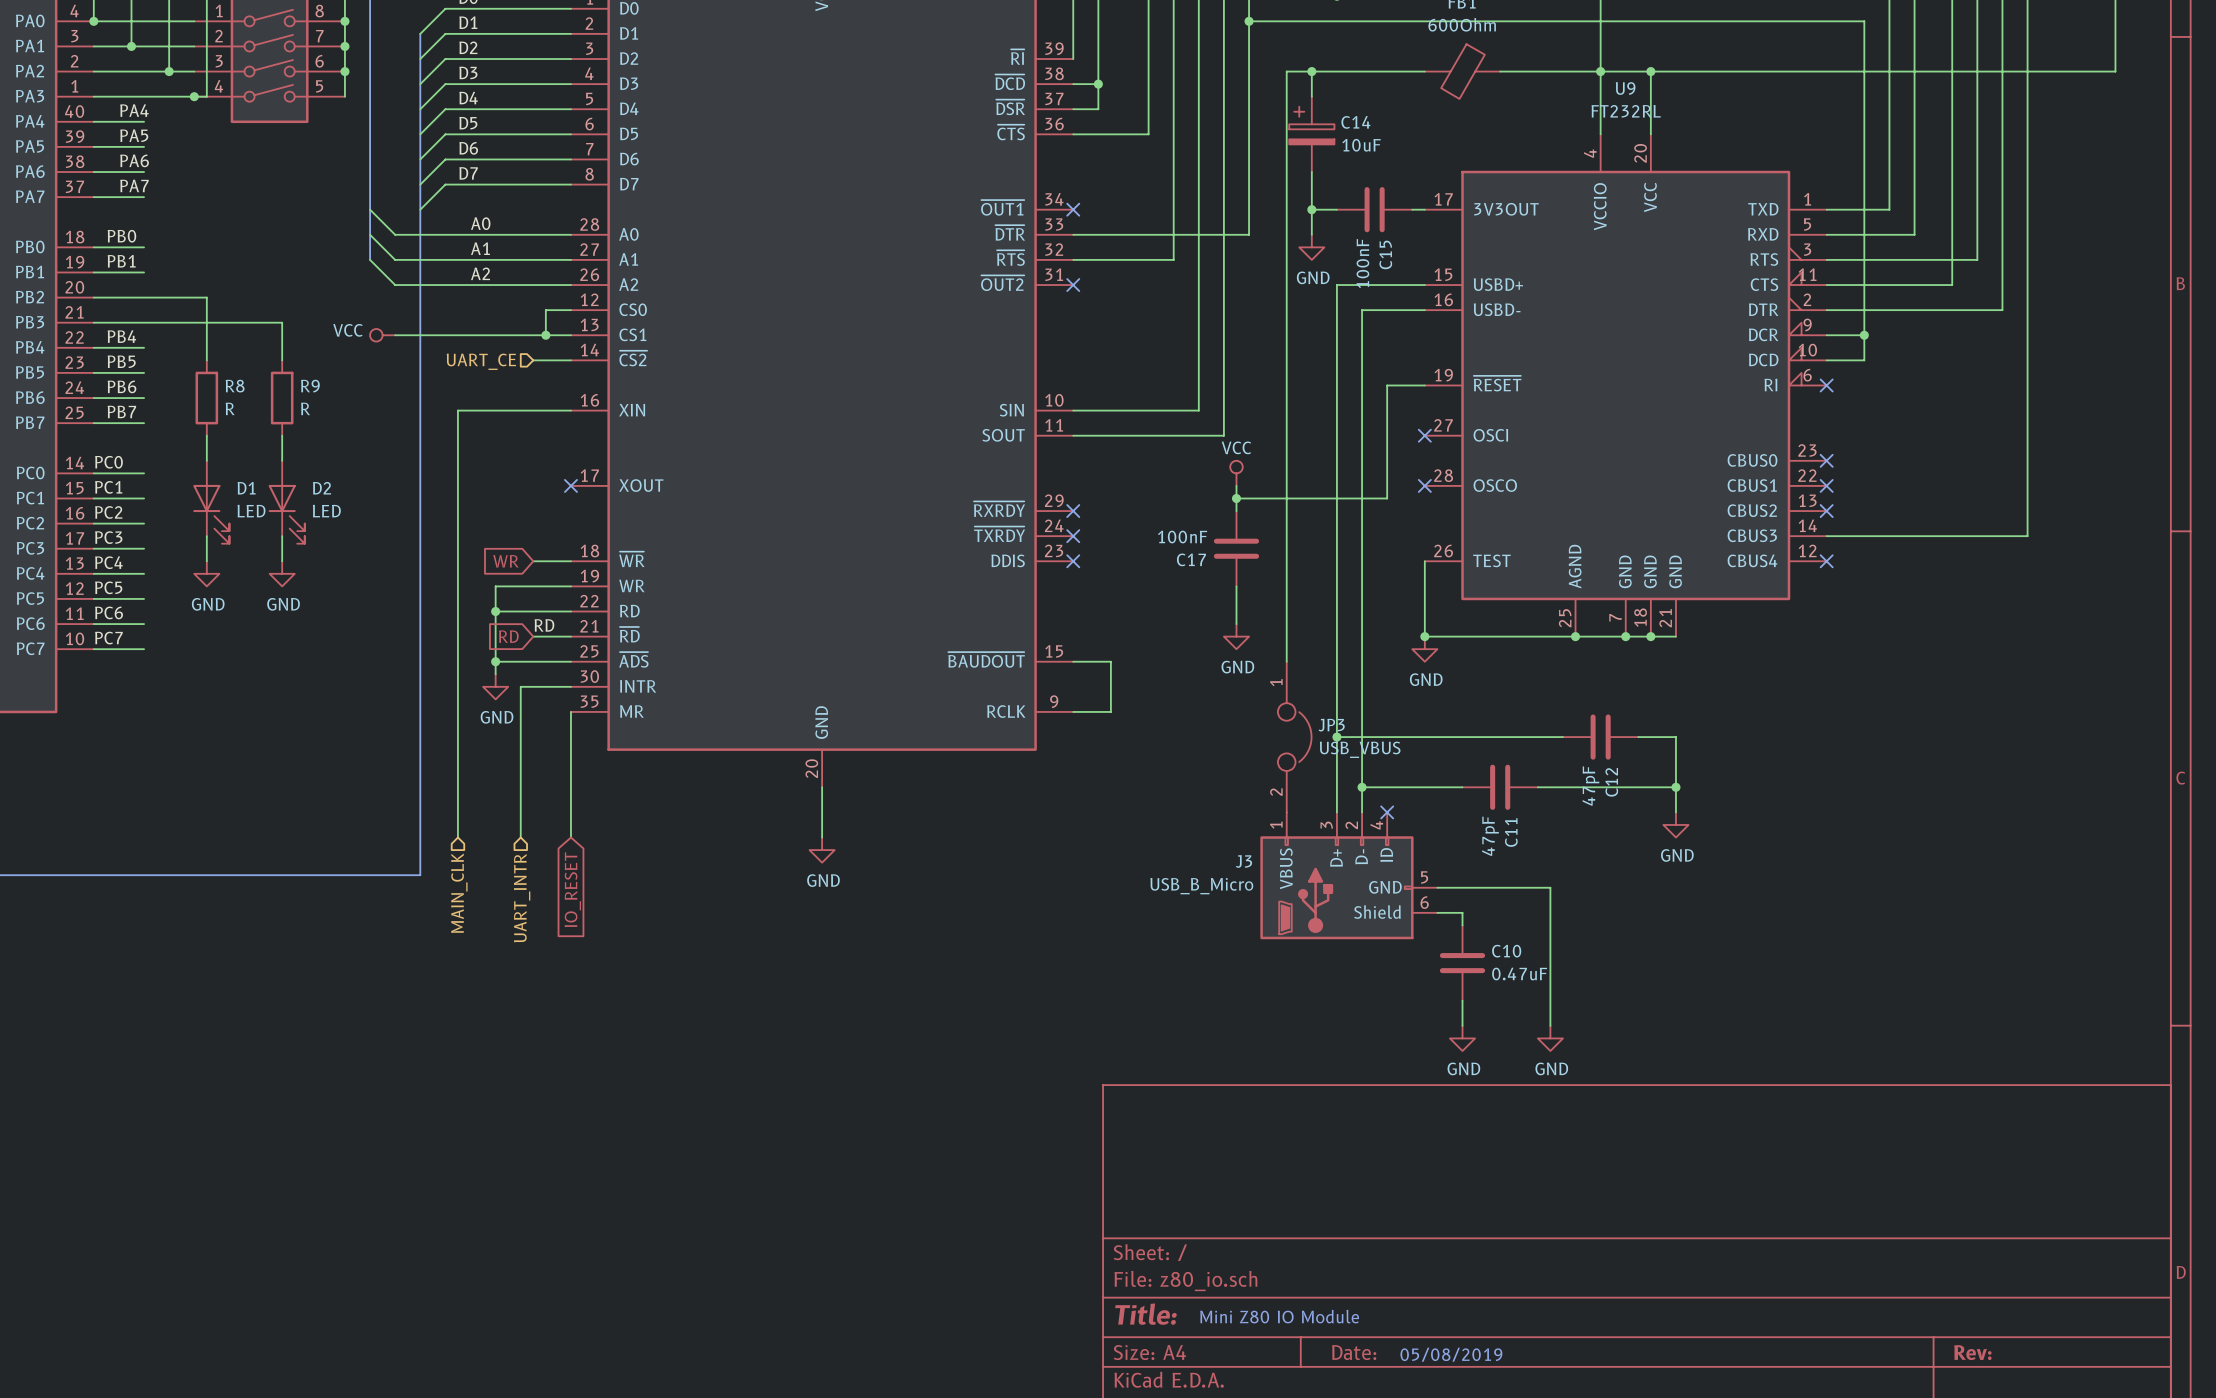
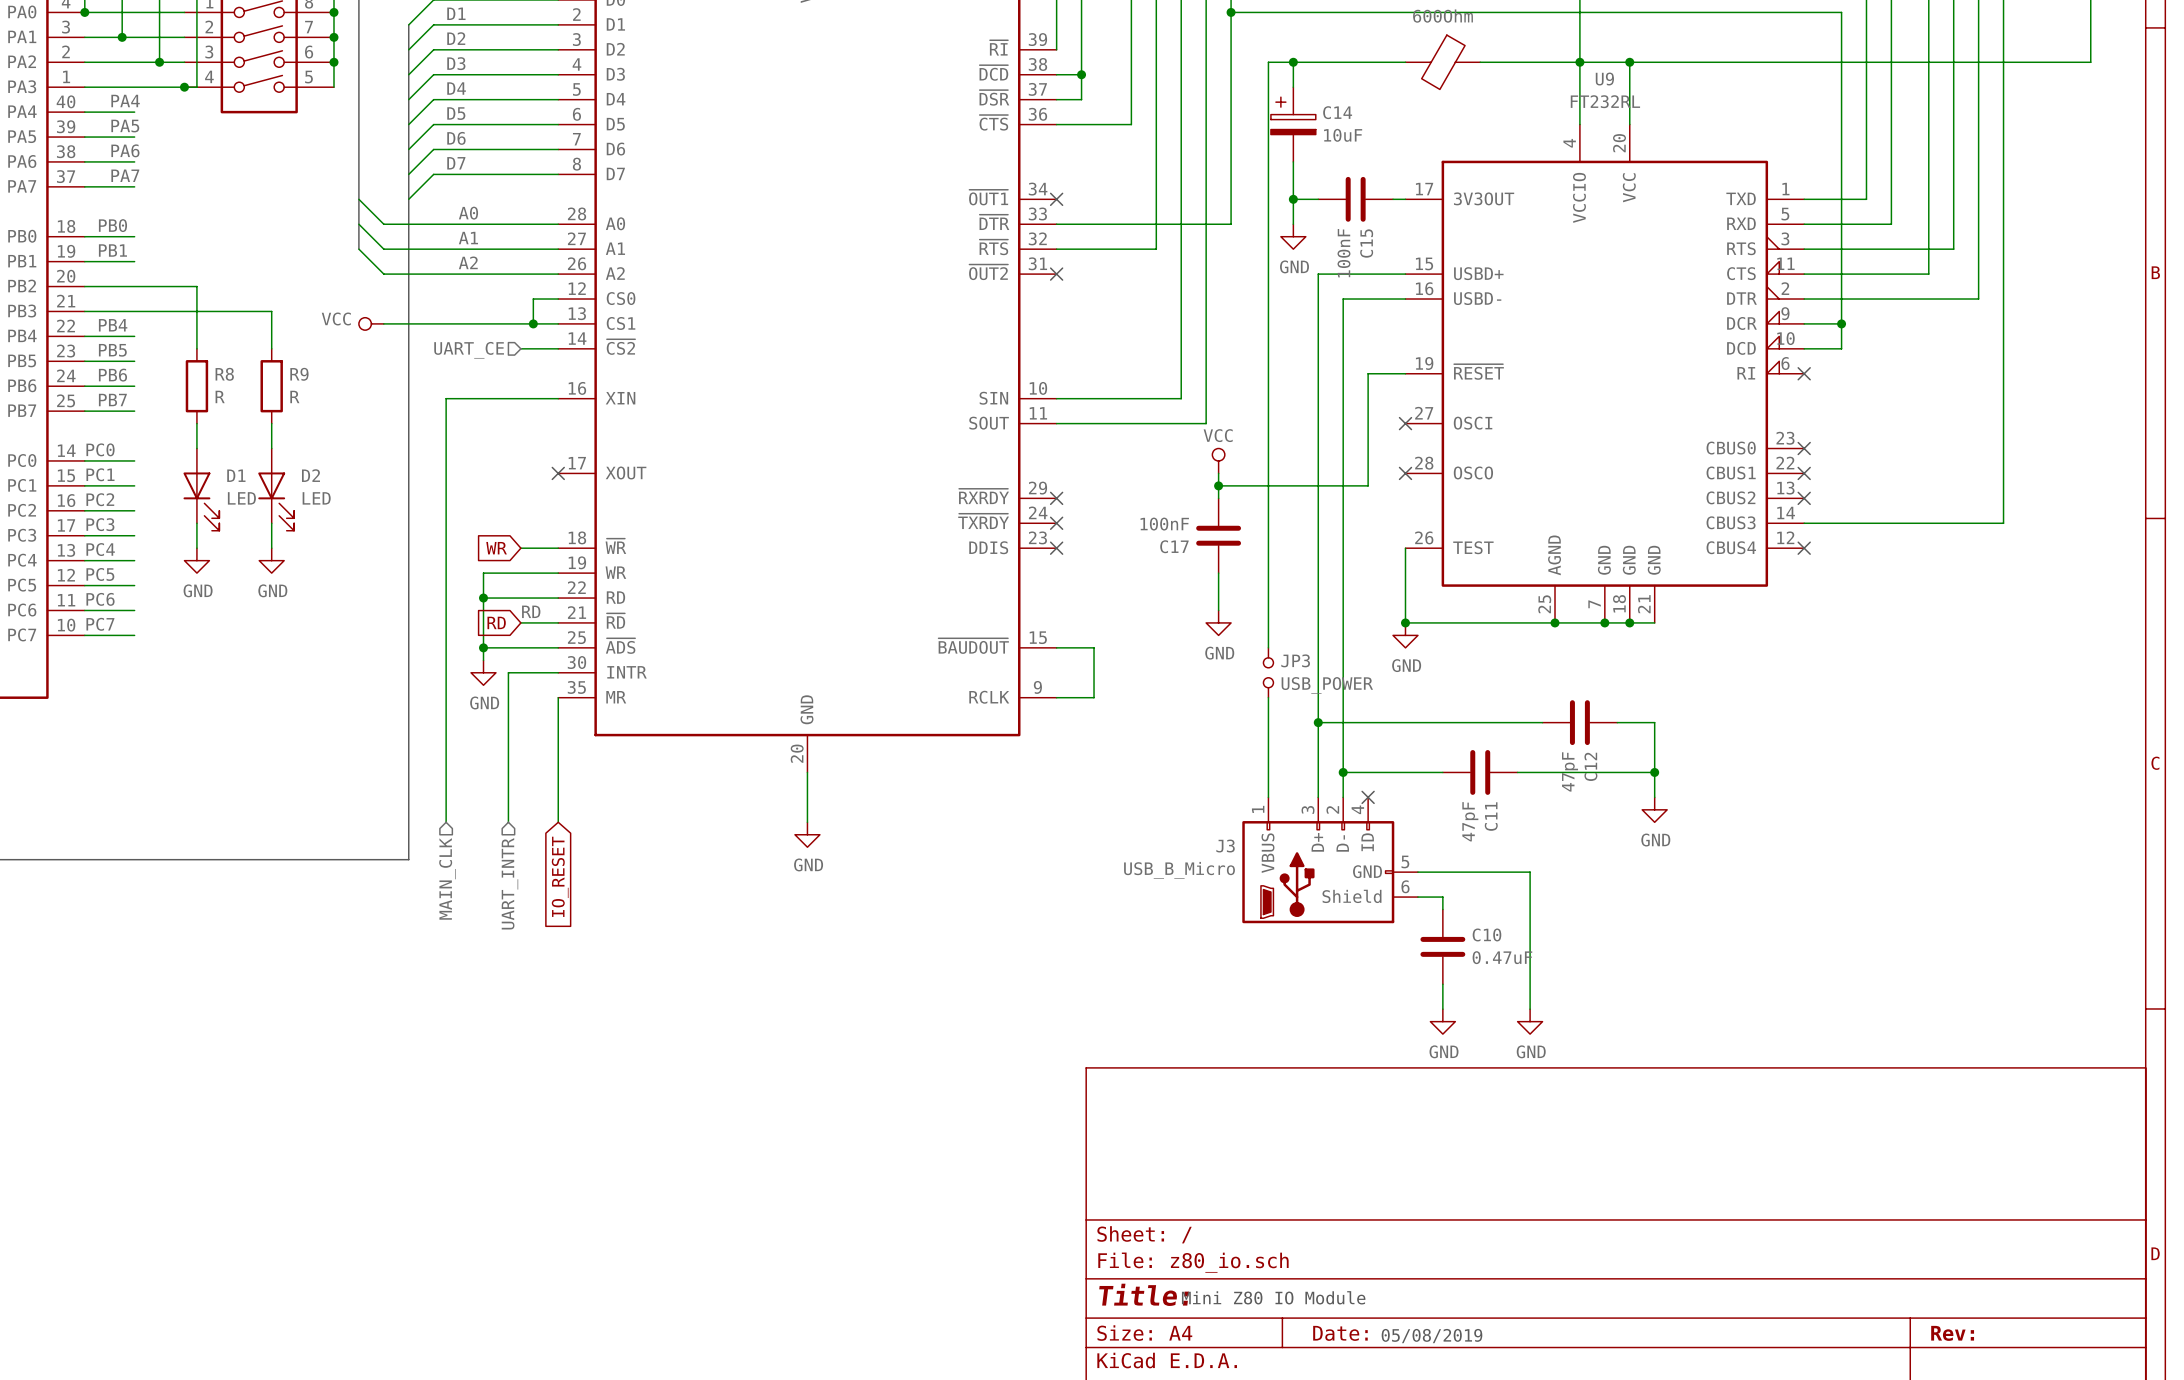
JP3 symbol: [1277, 661, 1312, 813] -> [1263, 647, 1274, 698]
wire: none -> (1268, 697) (1268, 797)
JP3 value: USB_VBUS (1360, 749) -> USB_POWER (1327, 685)

